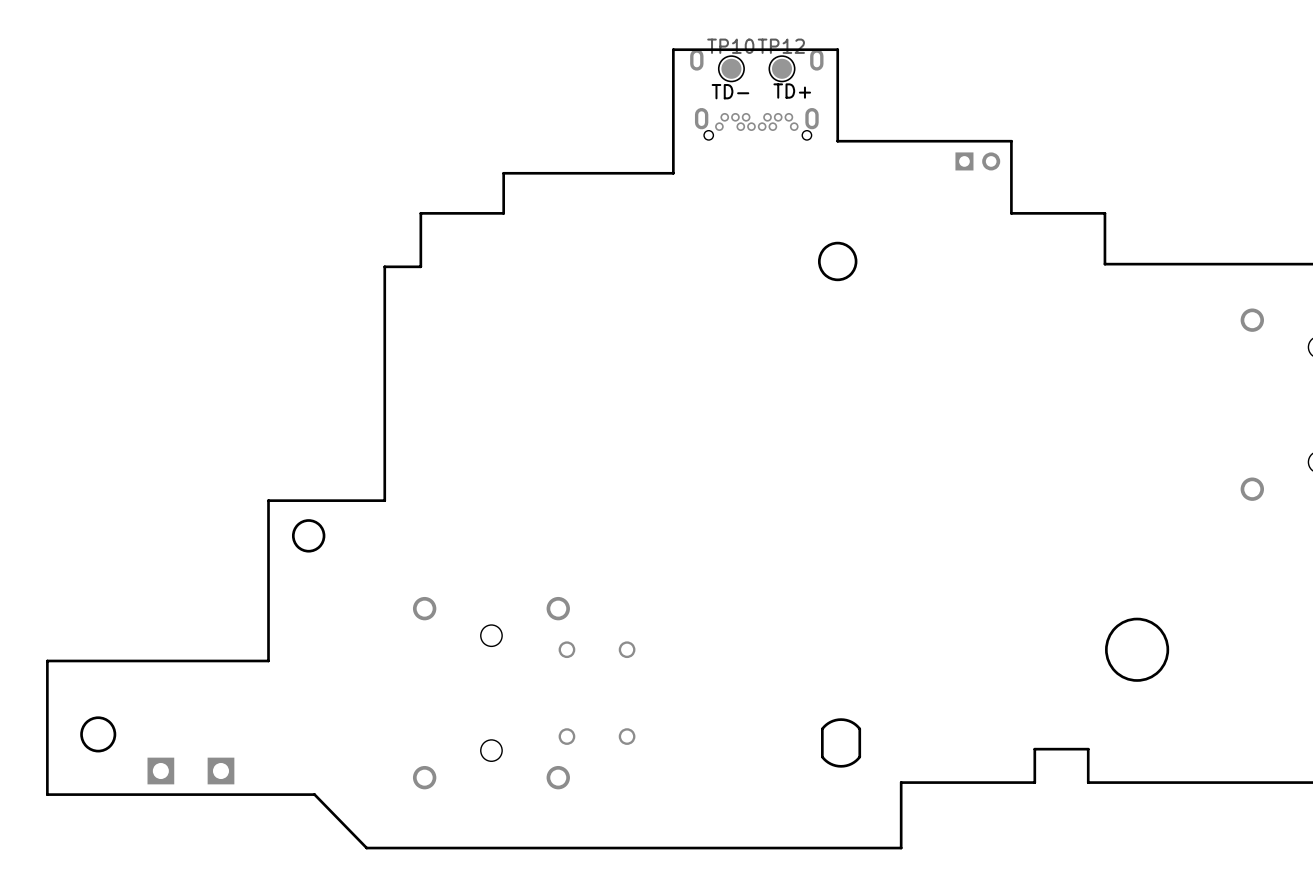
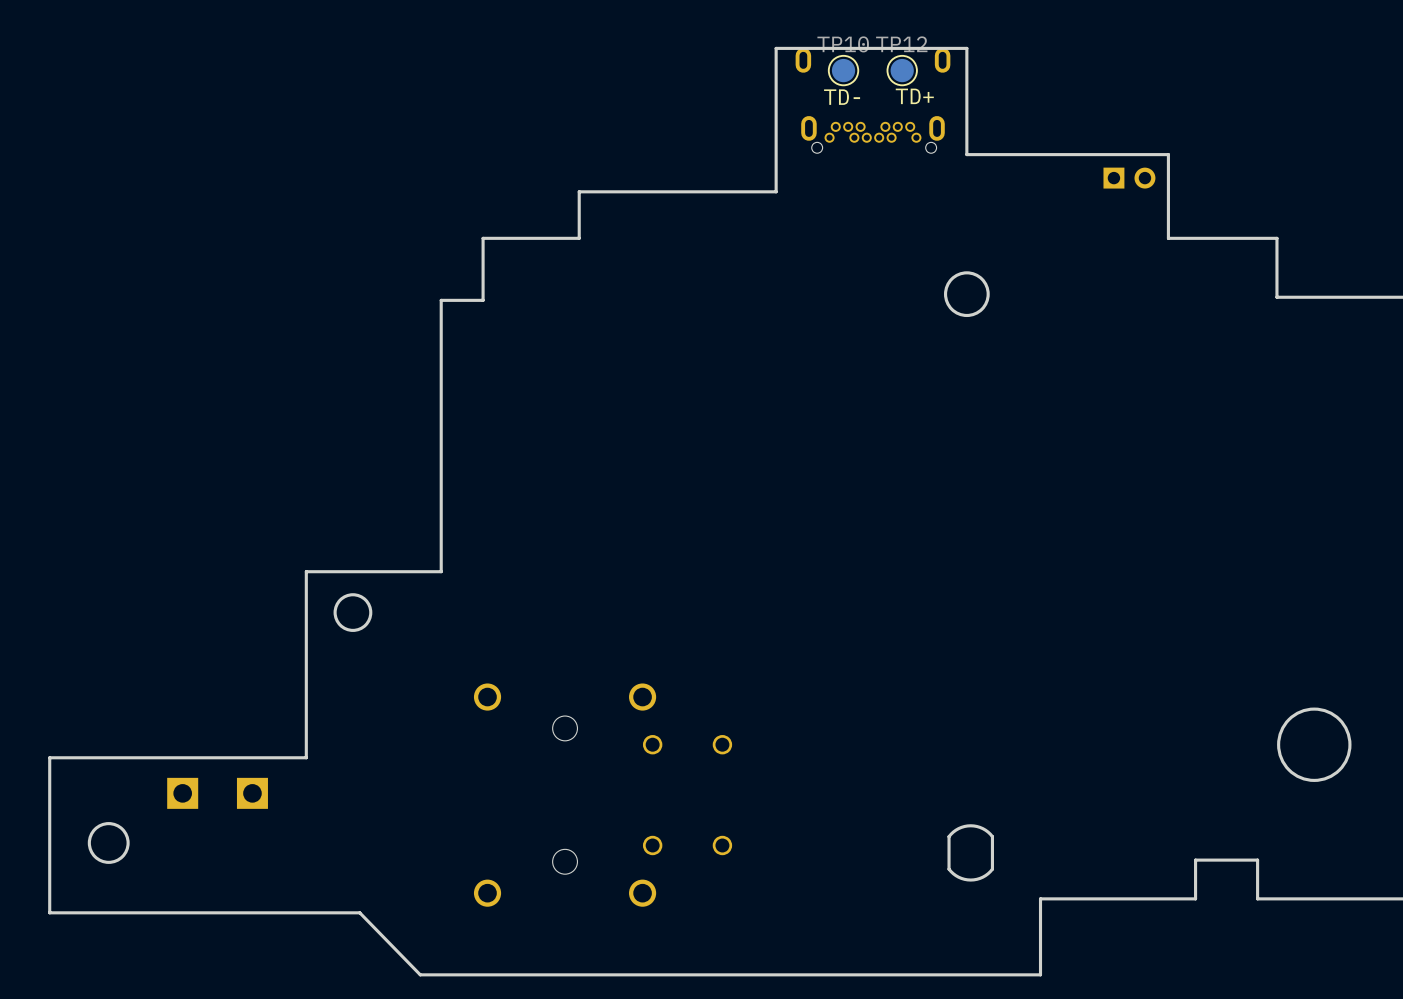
part: none -> (182, 793)
part: none -> (252, 793)
part: (160, 771) -> none
part: (220, 771) -> none

